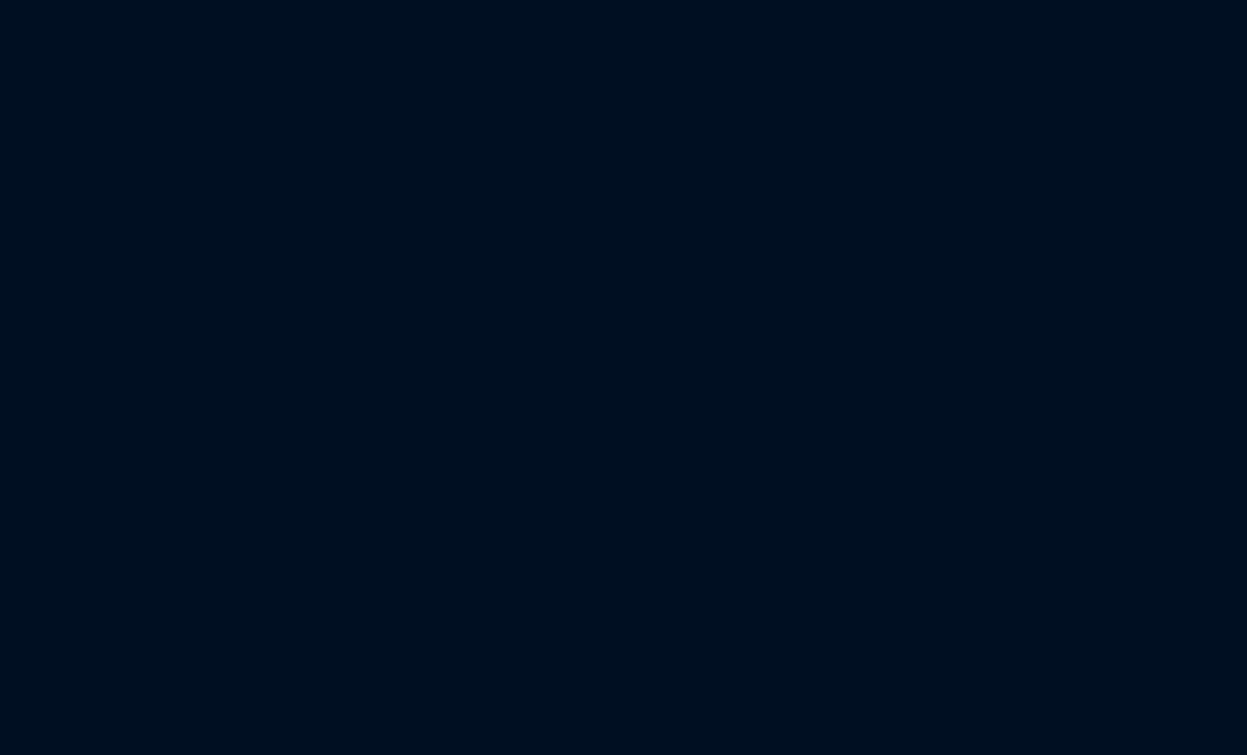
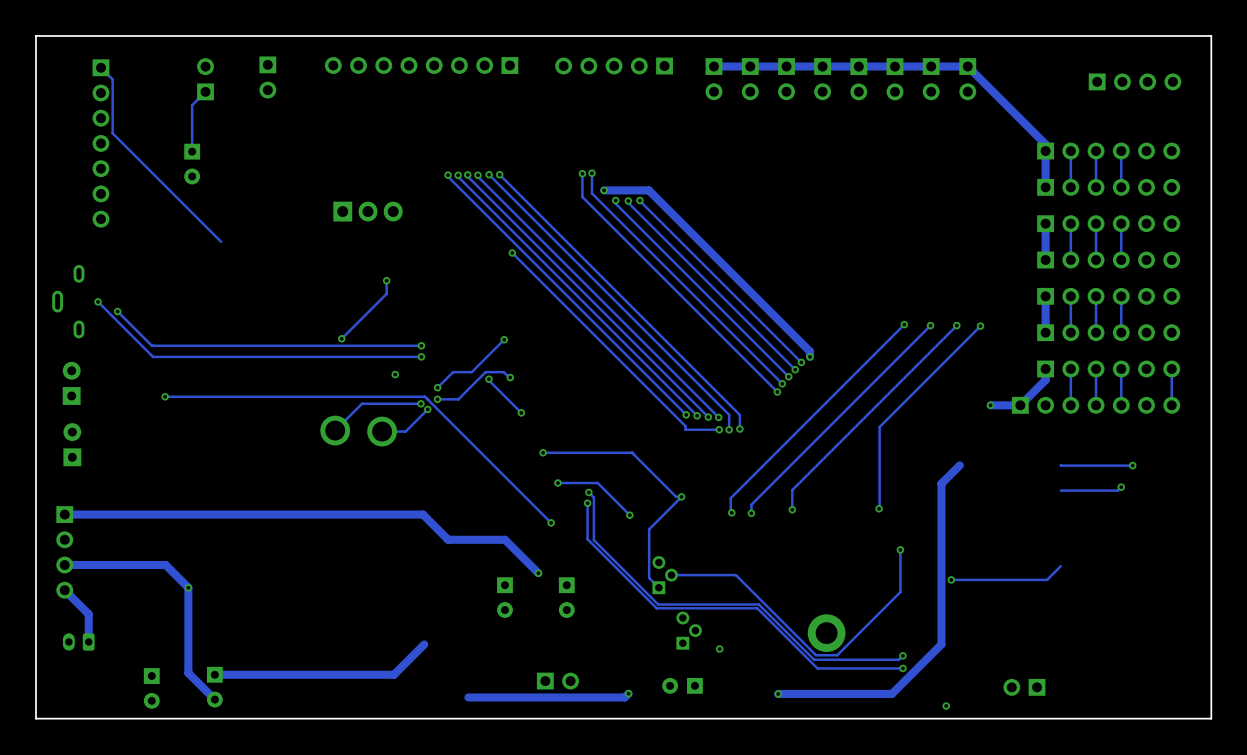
board edge: none -> (1211, 35) (1211, 718) (35, 718) (35, 35) (1211, 35)
part: none -> (421, 65)
part: none -> (614, 66)
track: none -> (713, 66) (967, 66) (1045, 144) (1045, 187)
track: none -> (100, 67) (112, 79) (112, 133) (221, 241)
part: none -> (267, 77)
part: none -> (205, 79)
part: none -> (713, 79)
part: none -> (750, 79)
part: none -> (786, 79)
part: none -> (822, 79)
part: none -> (858, 79)
part: none -> (895, 79)
part: none -> (931, 79)
part: none -> (967, 79)
part: none -> (1135, 81)
track: none -> (205, 91) (192, 105) (192, 151)
part: none -> (100, 143)
track: none -> (1070, 151) (1070, 187)
track: none -> (1096, 151) (1096, 187)
part: none -> (1108, 151)
track: none -> (1121, 151) (1121, 187)
part: none -> (192, 164)
track: none -> (582, 173) (582, 197) (777, 392)
via: none -> (582, 173)
track: none -> (592, 173) (592, 193) (782, 383)
via: none -> (592, 173)
track: none -> (467, 174) (708, 417)
via: none -> (467, 174)
track: none -> (489, 174) (729, 414) (729, 429)
via: none -> (489, 174)
track: none -> (499, 174) (739, 414) (739, 429)
via: none -> (499, 174)
track: none -> (448, 175) (686, 414)
via: none -> (448, 175)
track: none -> (458, 175) (697, 415)
via: none -> (458, 175)
track: none -> (477, 175) (718, 417)
via: none -> (477, 175)
part: none -> (1108, 187)
track: none -> (604, 190) (648, 190) (809, 351) (809, 356)
via: none -> (604, 190)
track: none -> (615, 200) (615, 203) (788, 376)
via: none -> (615, 200)
track: none -> (628, 200) (795, 369)
via: none -> (628, 200)
track: none -> (639, 200) (801, 362)
via: none -> (639, 200)
part: none -> (367, 211)
track: none -> (1045, 223) (1045, 260)
track: none -> (1070, 223) (1070, 260)
track: none -> (1096, 223) (1096, 260)
part: none -> (1108, 223)
track: none -> (1121, 223) (1121, 260)
track: none -> (512, 252) (685, 426) (685, 429) (719, 429)
via: none -> (512, 252)
part: none -> (1108, 260)
track: none -> (386, 280) (386, 293) (341, 338)
via: none -> (386, 280)
track: none -> (1045, 296) (1045, 332)
track: none -> (1070, 296) (1070, 332)
track: none -> (1096, 296) (1096, 332)
part: none -> (1108, 296)
track: none -> (1121, 296) (1121, 332)
part: none -> (68, 301)
track: none -> (98, 301) (153, 356) (421, 356)
via: none -> (98, 301)
track: none -> (117, 311) (151, 345) (421, 345)
via: none -> (117, 311)
track: none -> (904, 324) (730, 498) (731, 512)
via: none -> (904, 324)
track: none -> (930, 325) (751, 504) (751, 513)
via: none -> (930, 325)
track: none -> (956, 325) (792, 490) (792, 509)
via: none -> (956, 325)
track: none -> (980, 326) (879, 427) (879, 508)
via: none -> (980, 326)
part: none -> (1108, 332)
via: none -> (341, 338)
track: none -> (504, 339) (471, 372) (453, 372) (437, 387)
via: none -> (504, 339)
via: none -> (421, 345)
via: none -> (421, 356)
via: none -> (809, 356)
via: none -> (801, 362)
via: none -> (795, 369)
track: none -> (1045, 369) (1045, 380) (1020, 405) (990, 405)
track: none -> (1070, 369) (1070, 405)
track: none -> (1096, 369) (1096, 405)
part: none -> (1108, 369)
track: none -> (1121, 369) (1121, 405)
track: none -> (1171, 369) (1171, 405)
via: none -> (395, 374)
via: none -> (788, 376)
track: none -> (510, 377) (503, 372) (485, 372) (458, 399) (437, 399)
via: none -> (510, 377)
track: none -> (488, 379) (521, 412)
via: none -> (488, 379)
part: none -> (71, 383)
via: none -> (782, 383)
via: none -> (437, 387)
via: none -> (777, 392)
track: none -> (165, 396) (425, 396) (551, 522)
via: none -> (165, 396)
via: none -> (437, 399)
track: none -> (420, 403) (361, 403) (335, 430)
via: none -> (420, 403)
via: none -> (990, 405)
part: none -> (1096, 405)
track: none -> (427, 409) (405, 431) (382, 431)
via: none -> (427, 409)
via: none -> (521, 412)
via: none -> (686, 414)
via: none -> (697, 415)
via: none -> (708, 417)
via: none -> (718, 417)
via: none -> (719, 429)
via: none -> (729, 429)
via: none -> (739, 429)
part: none -> (335, 430)
part: none -> (382, 431)
part: none -> (72, 444)
track: none -> (543, 452) (632, 452) (676, 496) (681, 496) (649, 529) (649, 578) (658, 587)
via: none -> (543, 452)
track: none -> (959, 465) (941, 483) (941, 644) (891, 693) (778, 693)
track: none -> (1060, 465) (1132, 465)
via: none -> (1132, 465)
track: none -> (557, 483) (597, 483) (629, 515)
via: none -> (557, 483)
track: none -> (1121, 487) (1117, 490) (1060, 490)
via: none -> (1121, 487)
track: none -> (588, 492) (593, 497) (593, 540) (658, 604) (758, 604) (814, 659) (899, 659) (902, 655)
via: none -> (588, 492)
via: none -> (681, 496)
track: none -> (587, 503) (587, 539) (656, 608) (757, 608) (817, 668) (902, 668)
via: none -> (587, 503)
via: none -> (879, 508)
via: none -> (792, 509)
via: none -> (731, 512)
via: none -> (751, 513)
track: none -> (64, 514) (422, 514) (448, 539) (504, 539) (538, 573)
via: none -> (629, 515)
via: none -> (551, 522)
track: none -> (900, 549) (900, 592) (837, 655) (816, 655) (735, 575) (671, 575)
via: none -> (900, 549)
part: none -> (64, 552)
track: none -> (64, 565) (165, 565) (188, 587) (188, 673) (214, 699)
track: none -> (1060, 566) (1047, 579) (951, 579)
via: none -> (538, 573)
part: none -> (665, 575)
via: none -> (951, 579)
via: none -> (188, 587)
track: none -> (64, 590) (88, 614) (88, 641)
part: none -> (504, 597)
part: none -> (566, 597)
part: none -> (689, 630)
part: none -> (826, 633)
part: none -> (78, 641)
track: none -> (424, 644) (393, 674) (214, 674)
via: none -> (719, 649)
via: none -> (902, 655)
via: none -> (902, 668)
part: none -> (557, 681)
part: none -> (682, 685)
part: none -> (214, 687)
part: none -> (1024, 687)
part: none -> (151, 688)
track: none -> (628, 693) (624, 697) (468, 697)
via: none -> (628, 693)
via: none -> (778, 693)
via: none -> (946, 706)

